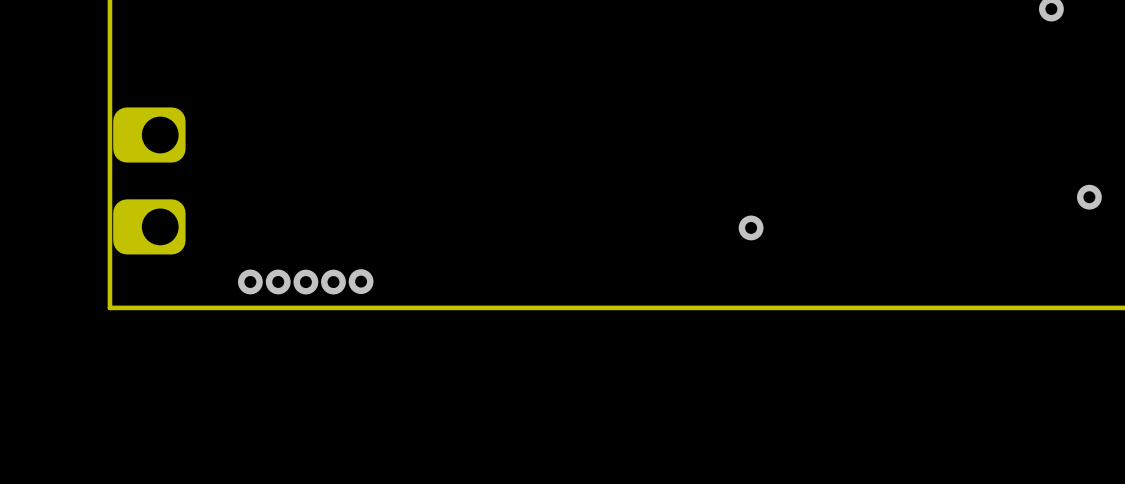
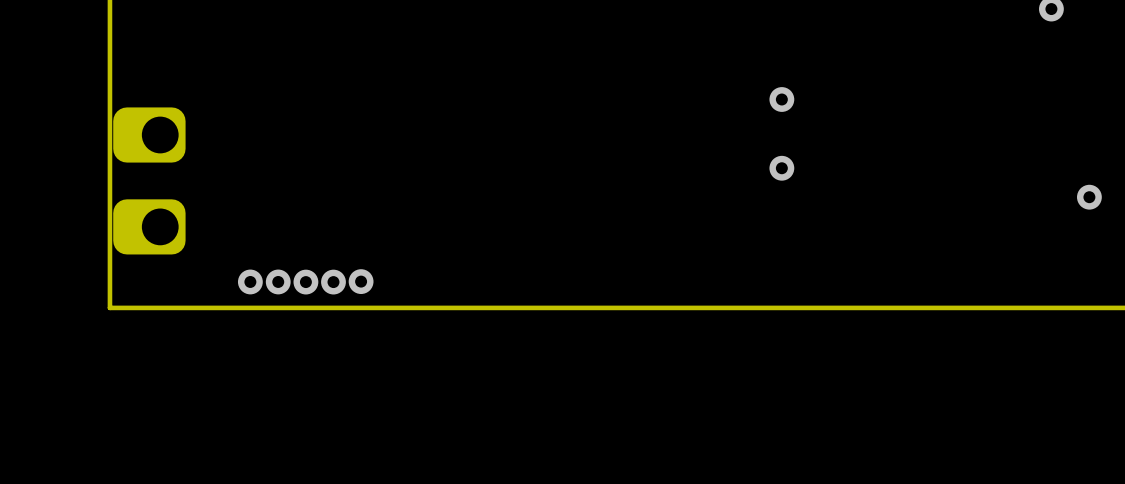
via: none -> (781, 99)
via: none -> (781, 168)
via: (751, 227) -> none

